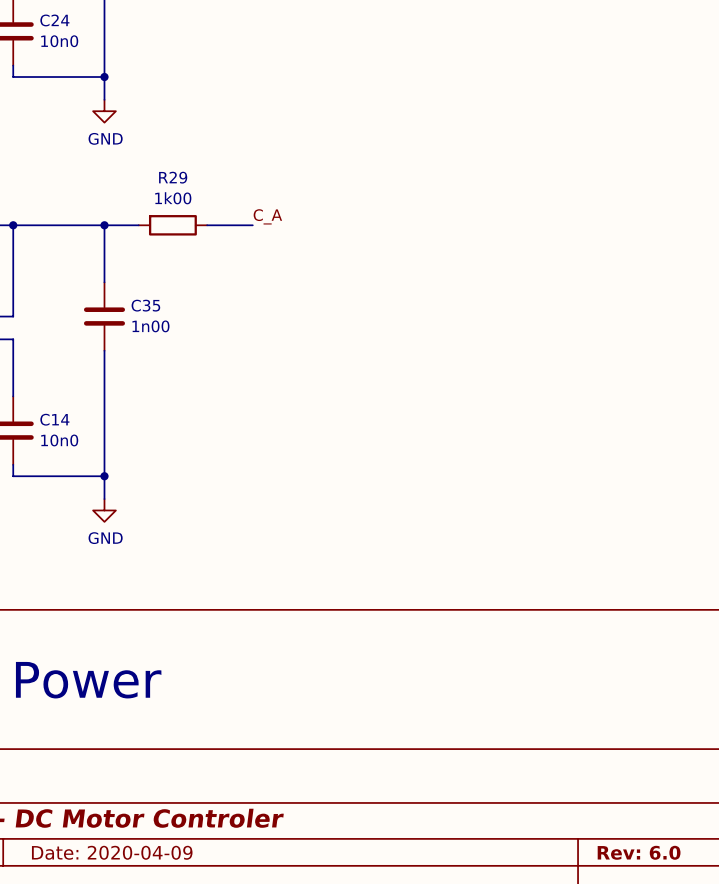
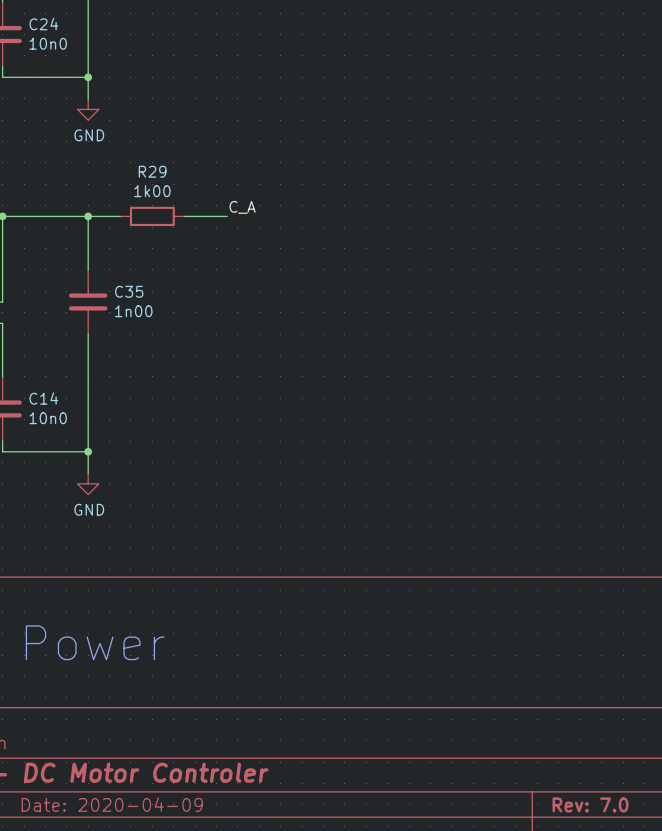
title block: Rev: 6.0 (639, 852) -> Rev: 7.0 (590, 804)

